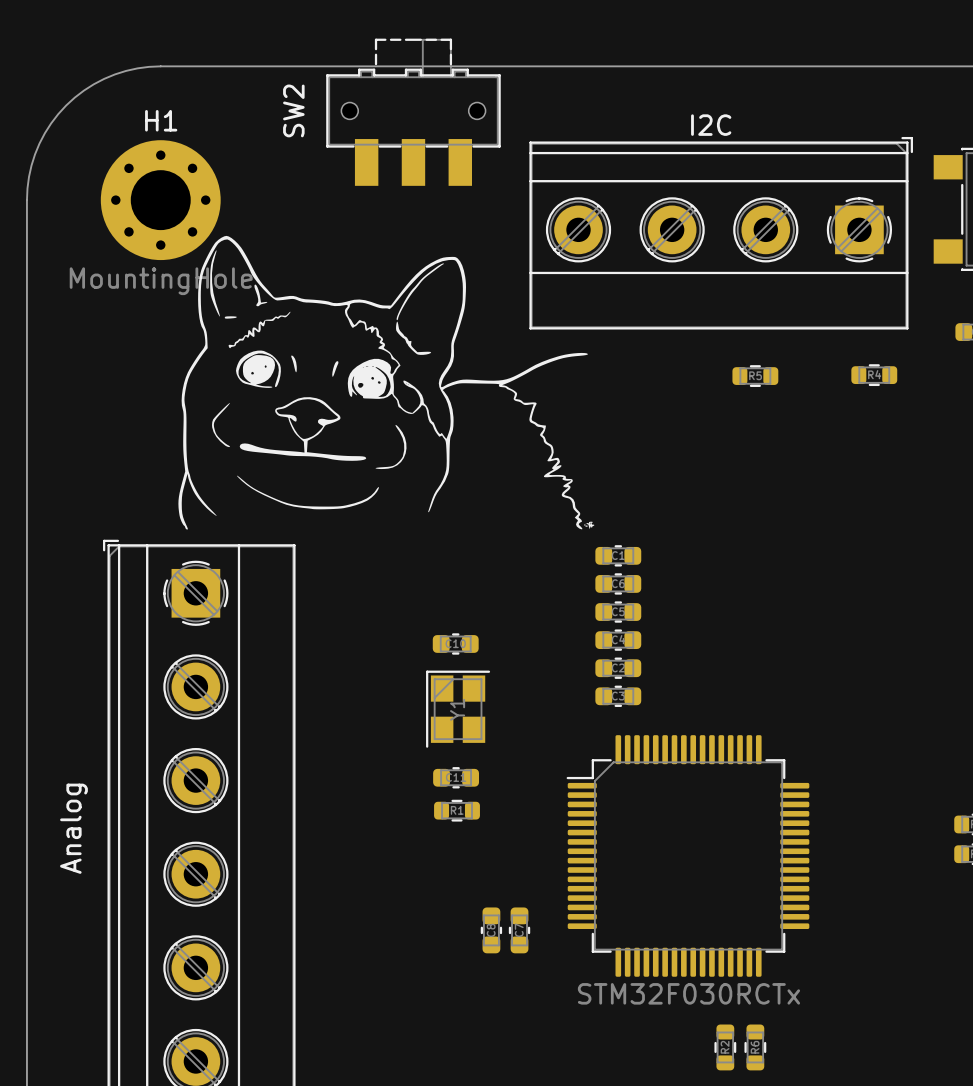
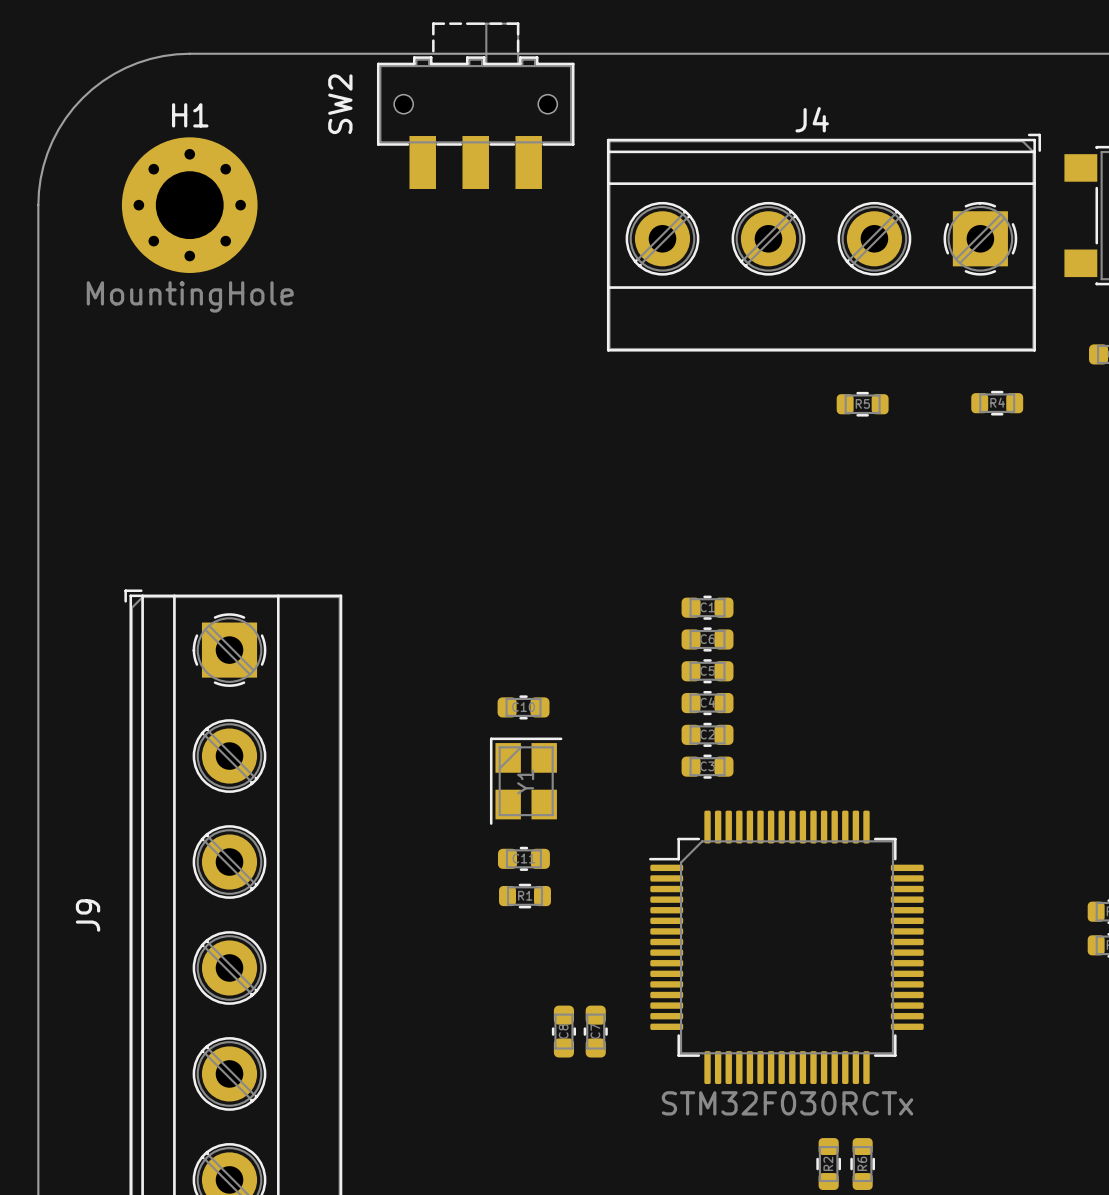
I2C name: I2C (711, 125) -> J4 (812, 119)
drawing: [178, 235, 595, 530] -> none
Analog name: Analog (73, 828) -> J9 (88, 915)

